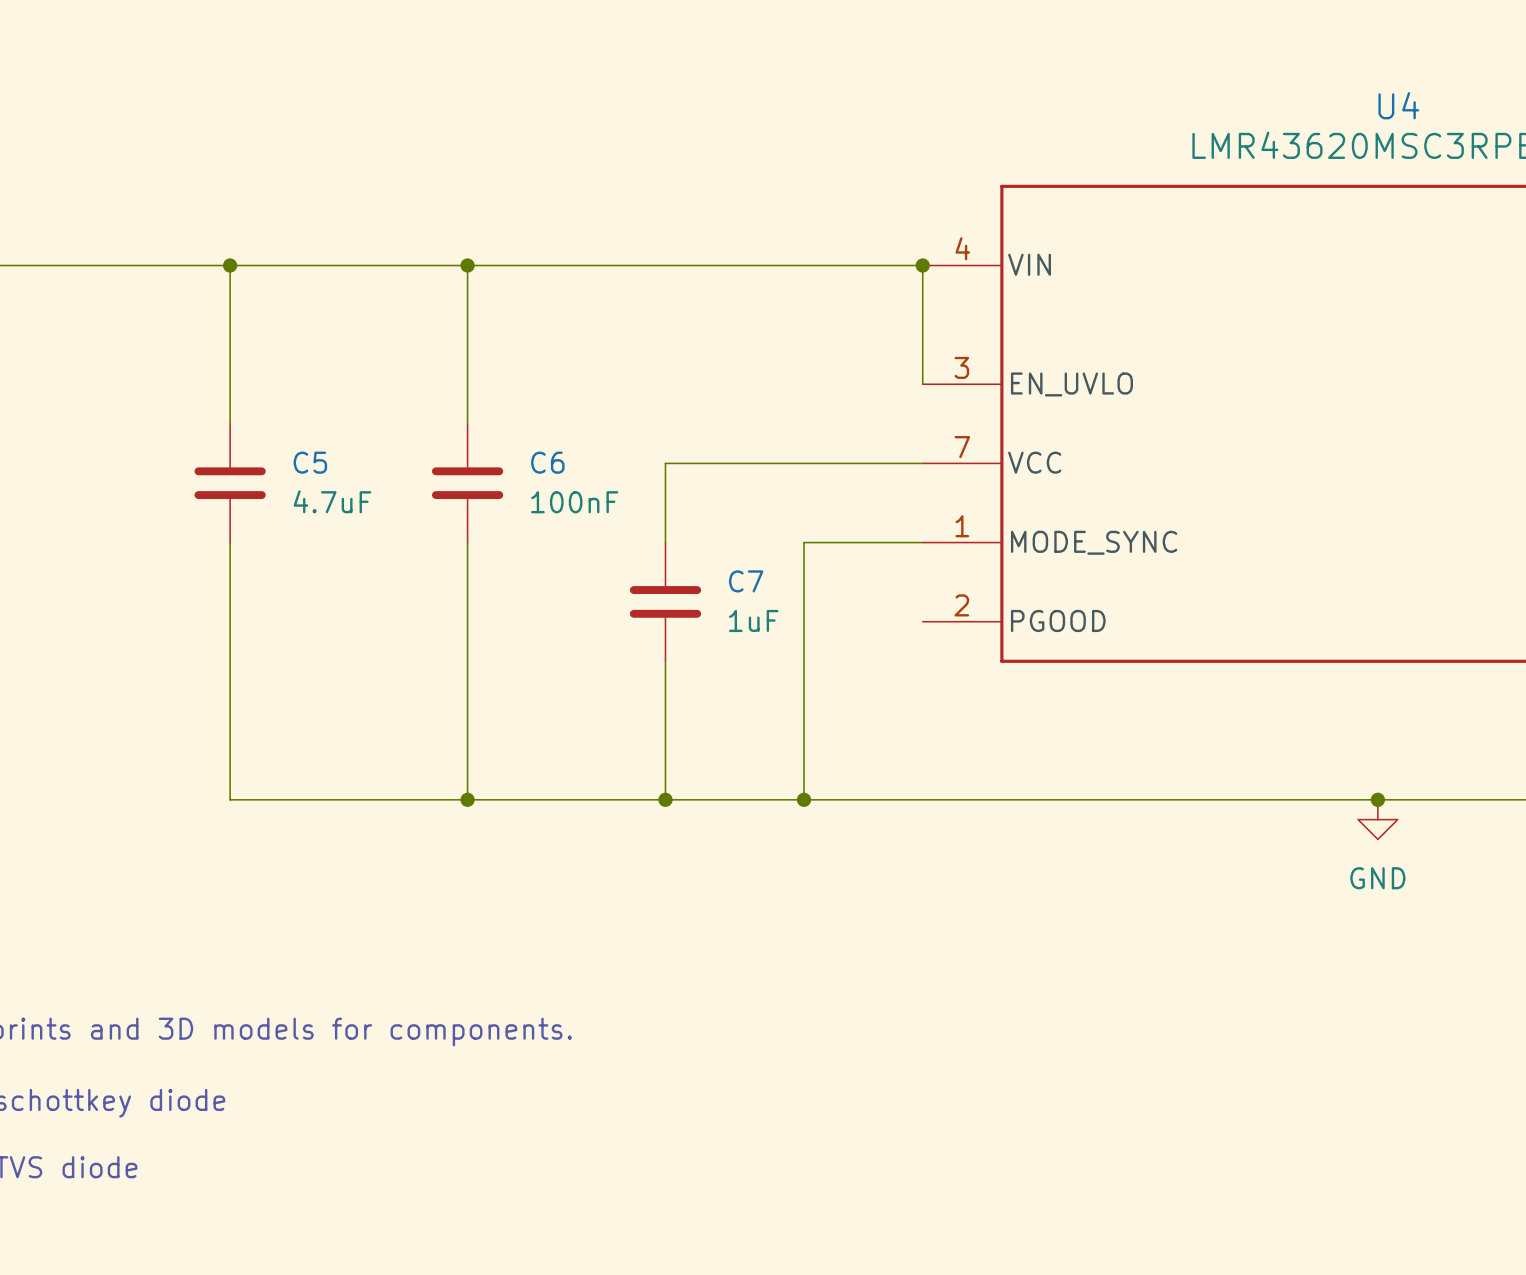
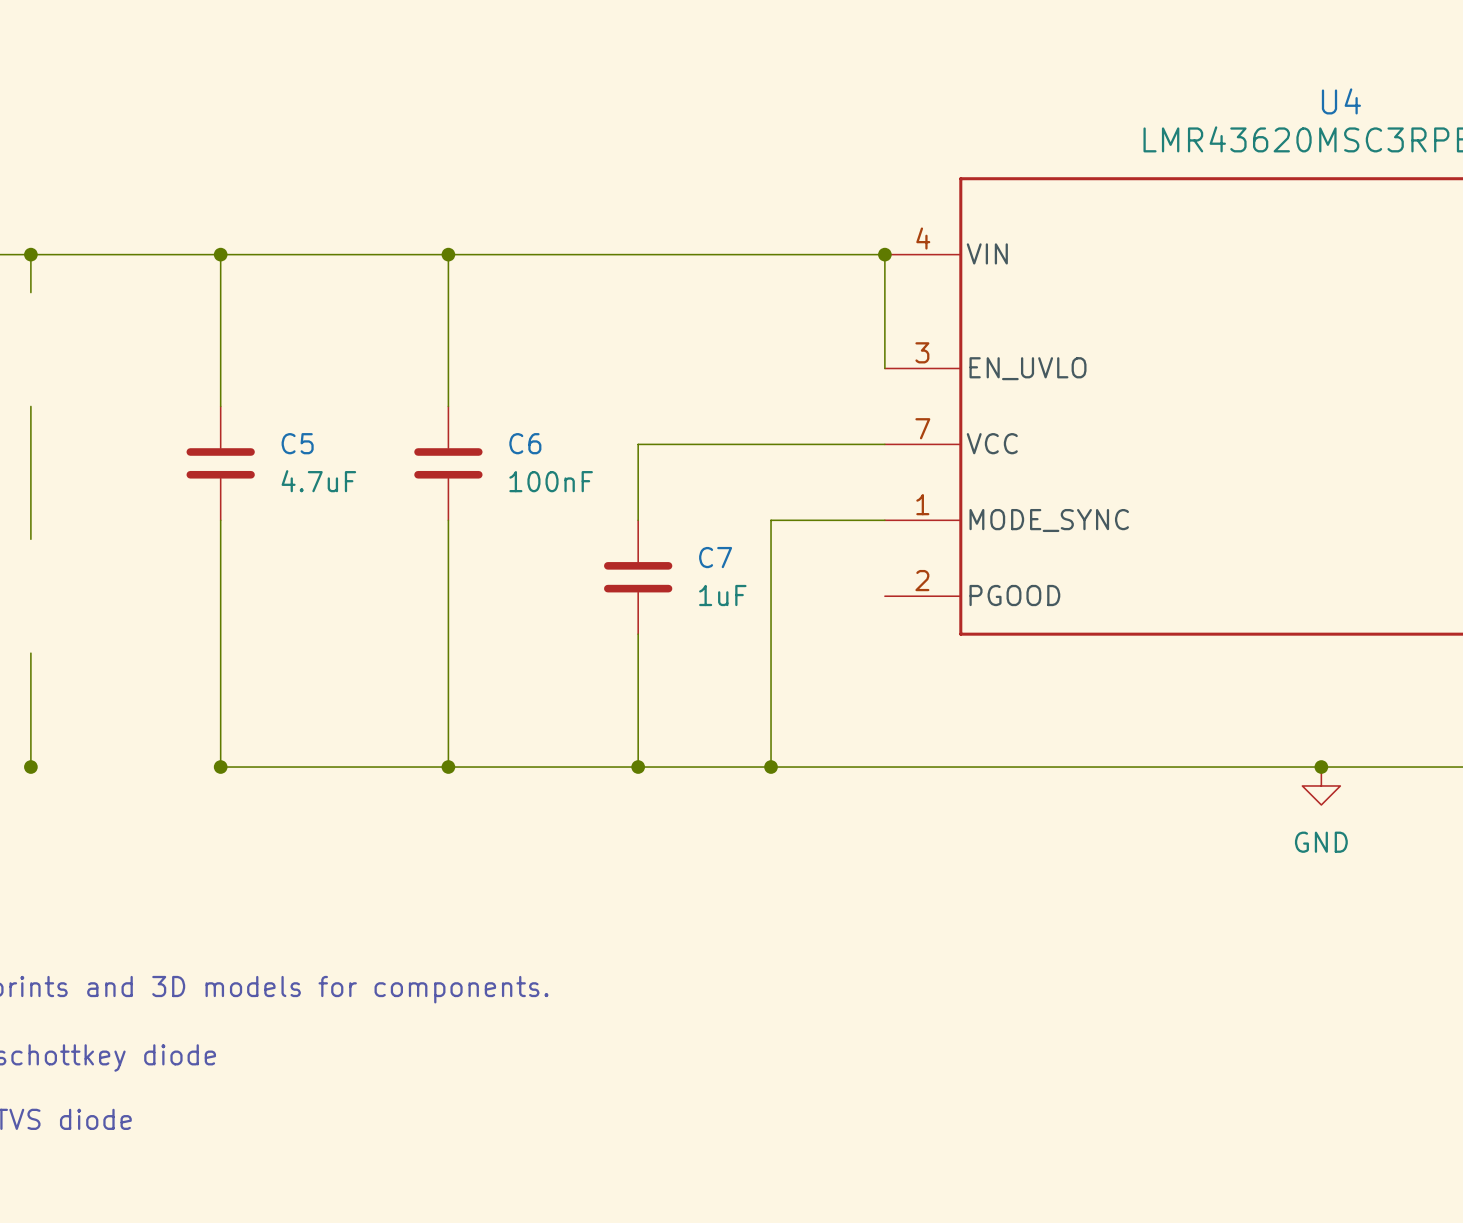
wire: none -> (30, 254) (30, 292)
junction: none -> (30, 254)
wire: none -> (30, 406) (30, 539)
wire: none -> (30, 653) (30, 767)
junction: none -> (30, 767)
junction: none -> (220, 767)

